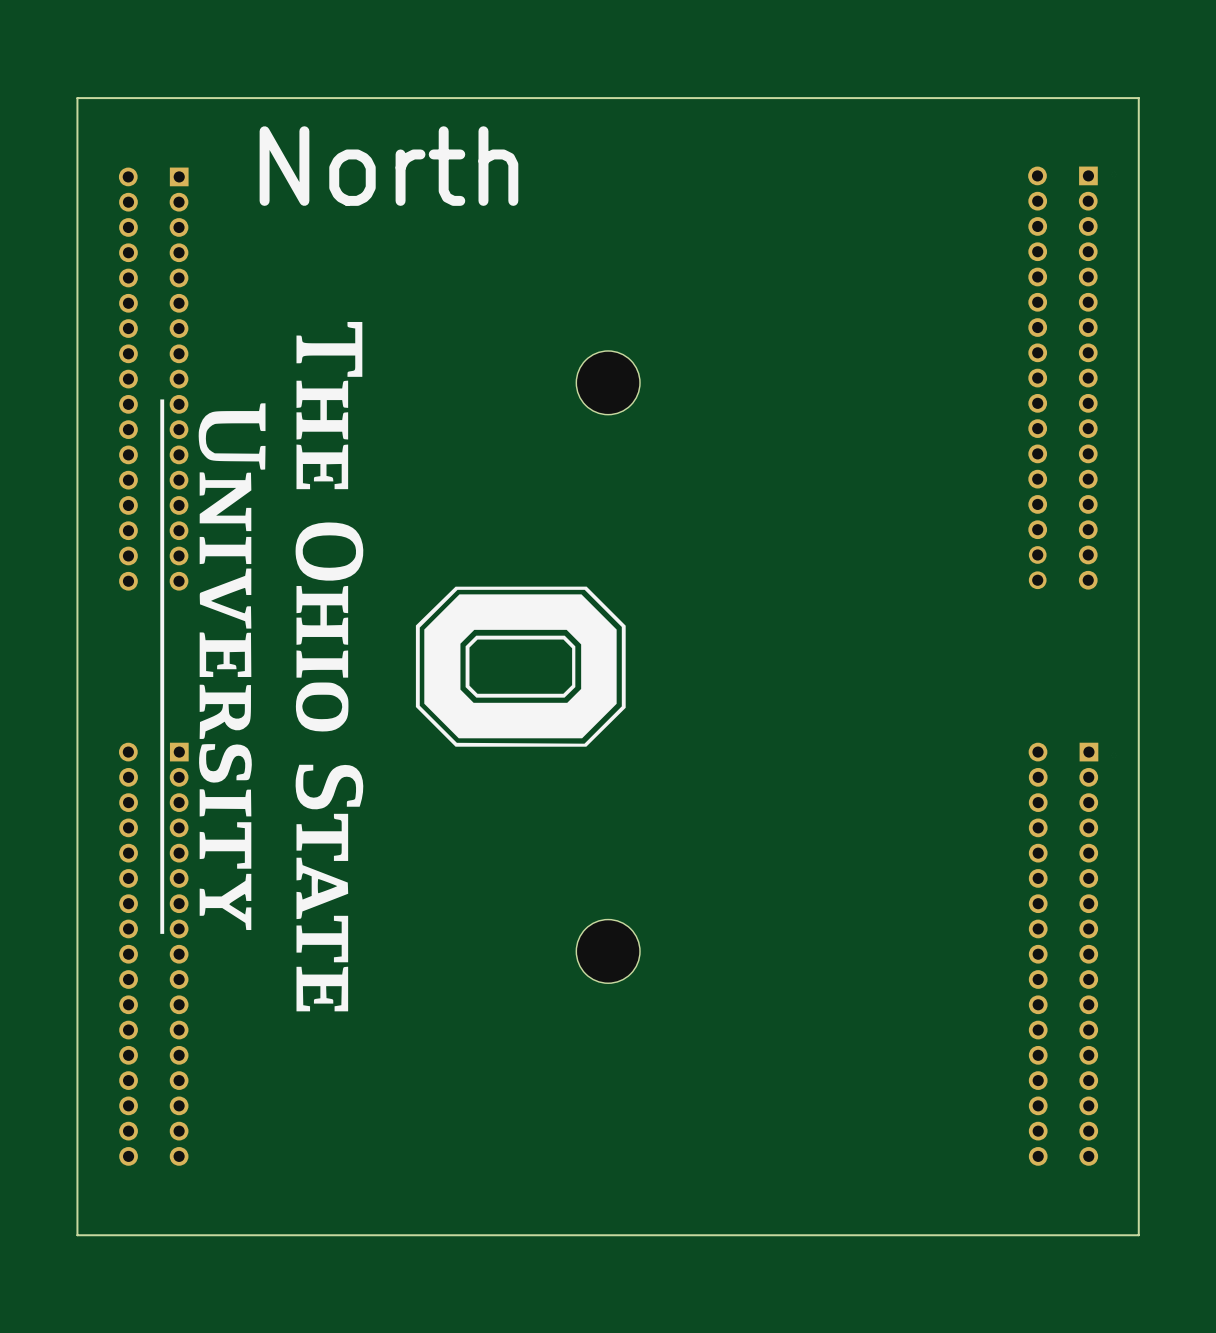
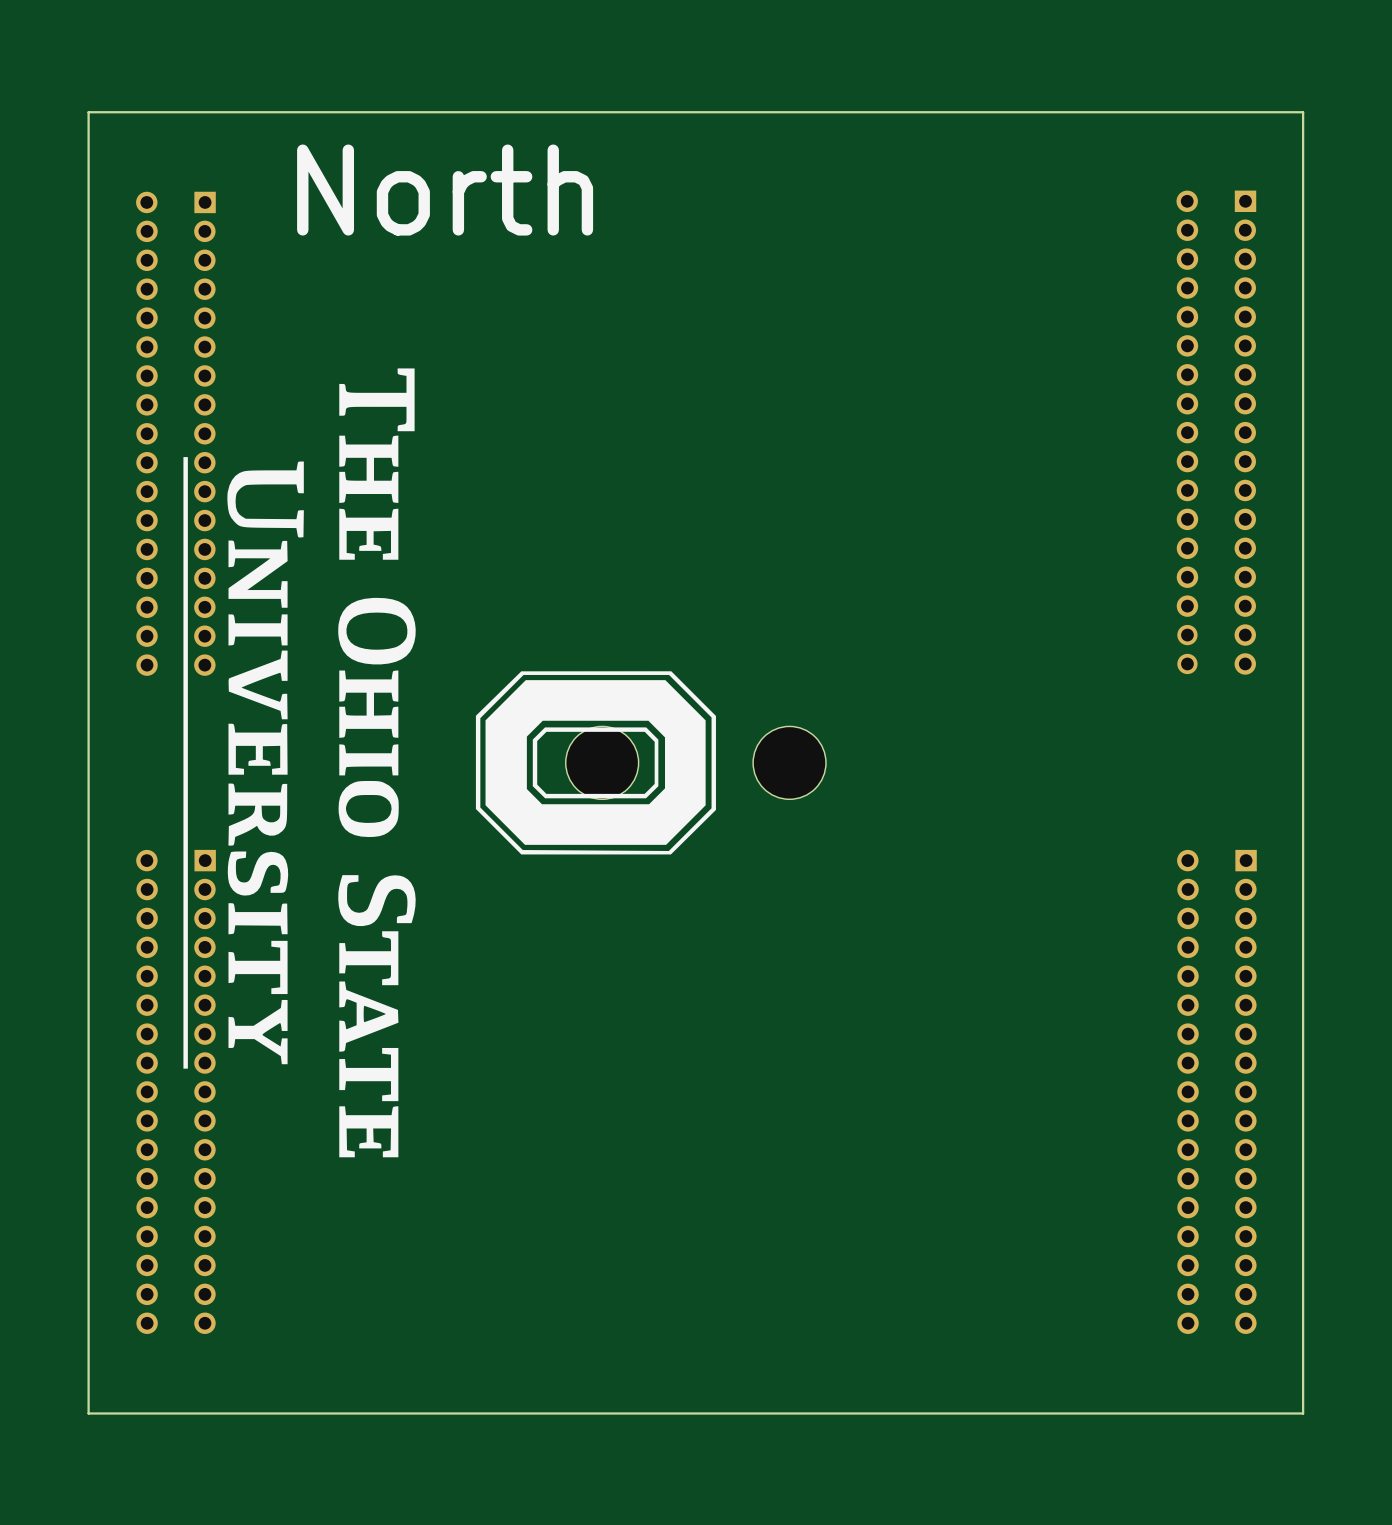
part: (608, 382) -> none
part: none -> (602, 762)
part: none -> (789, 762)
part: (608, 951) -> none

